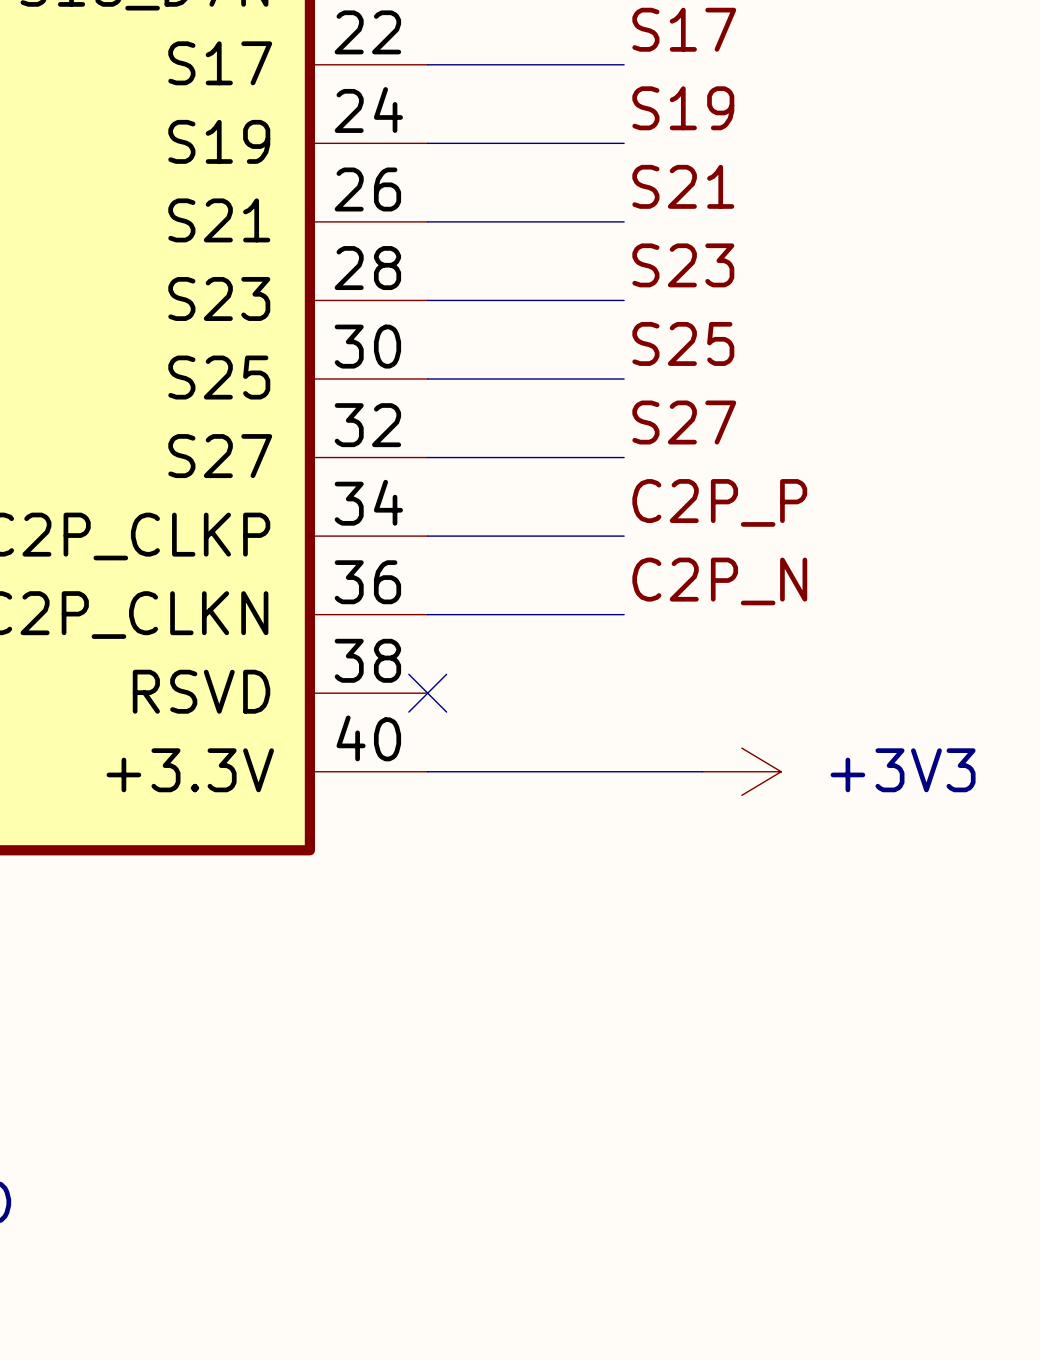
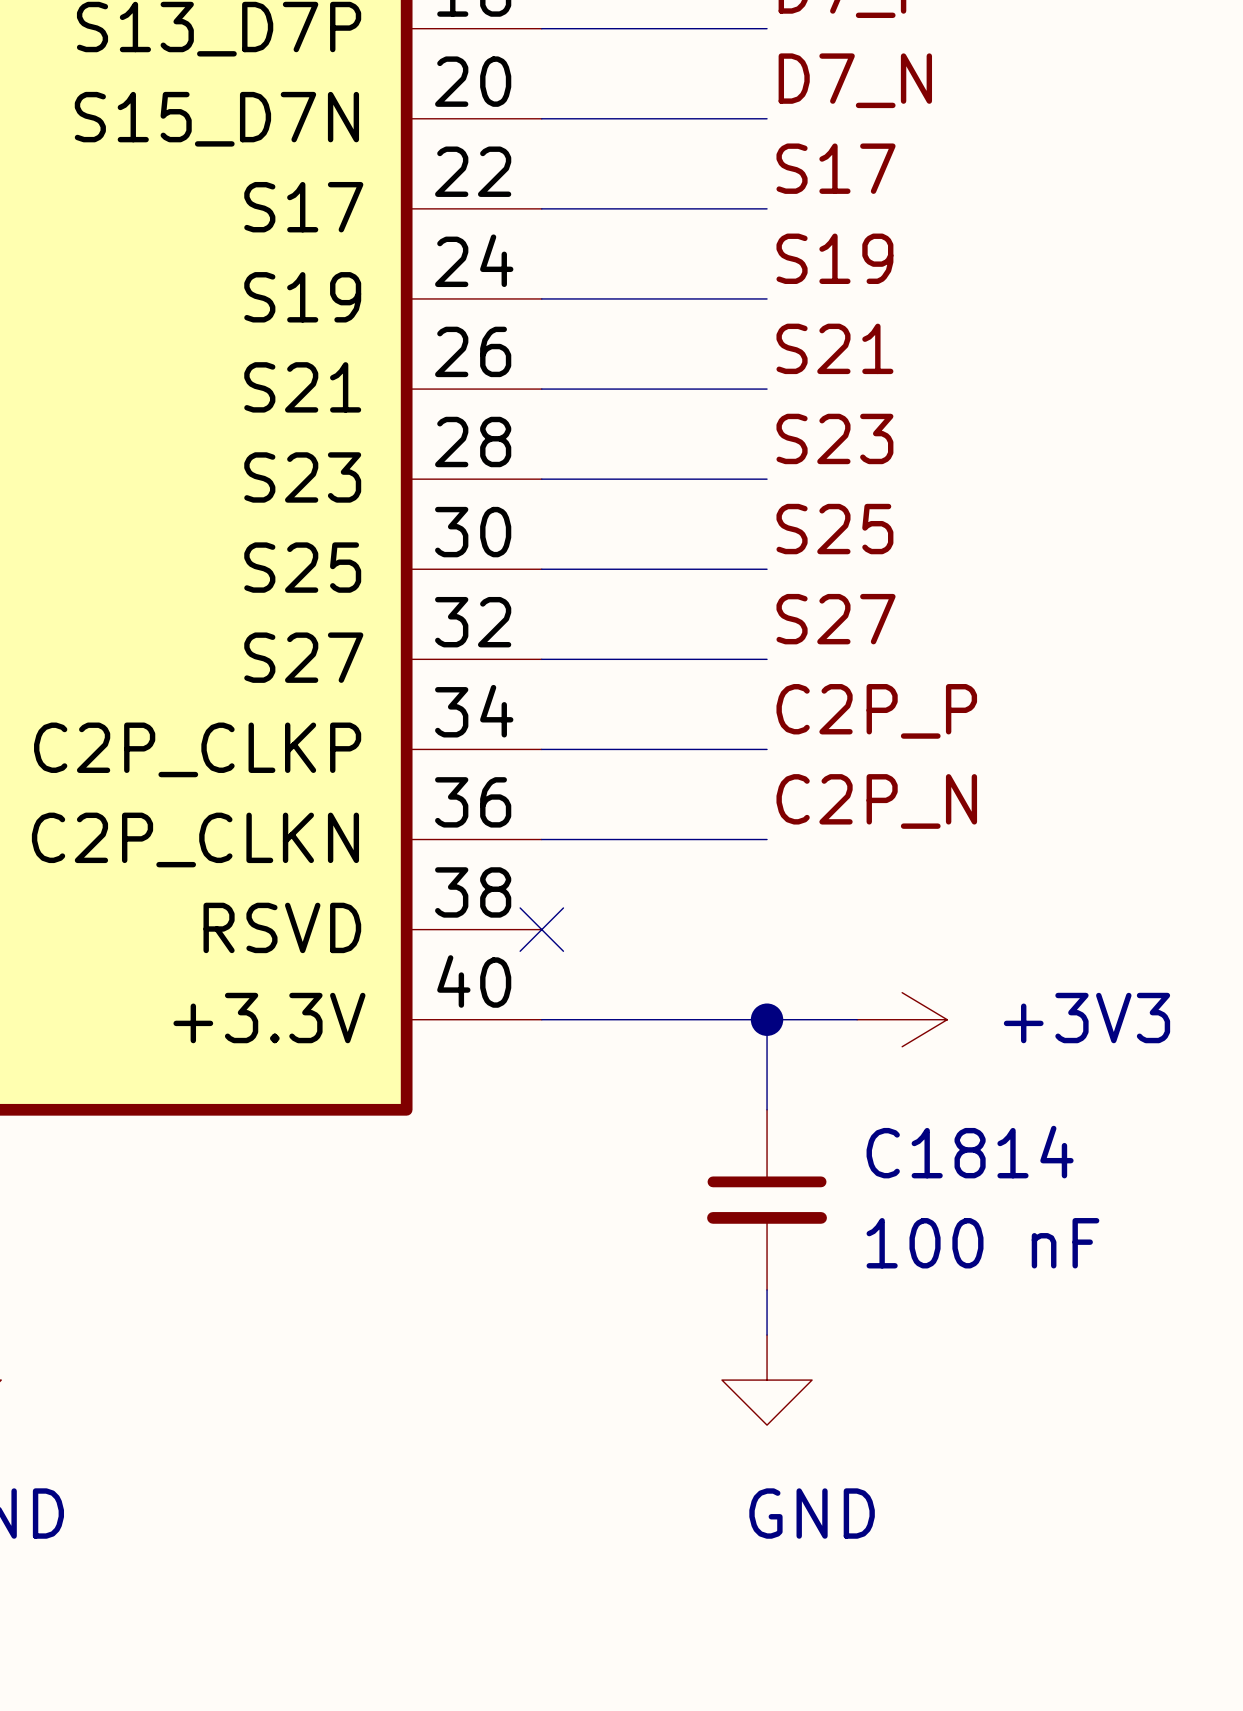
wire: none -> (767, 1019) (767, 1109)
junction: none -> (767, 1019)
C1814: none -> 100 nF (767, 1199)
wire: none -> (767, 1289) (767, 1335)
power symbol: none -> GND (767, 1380)

